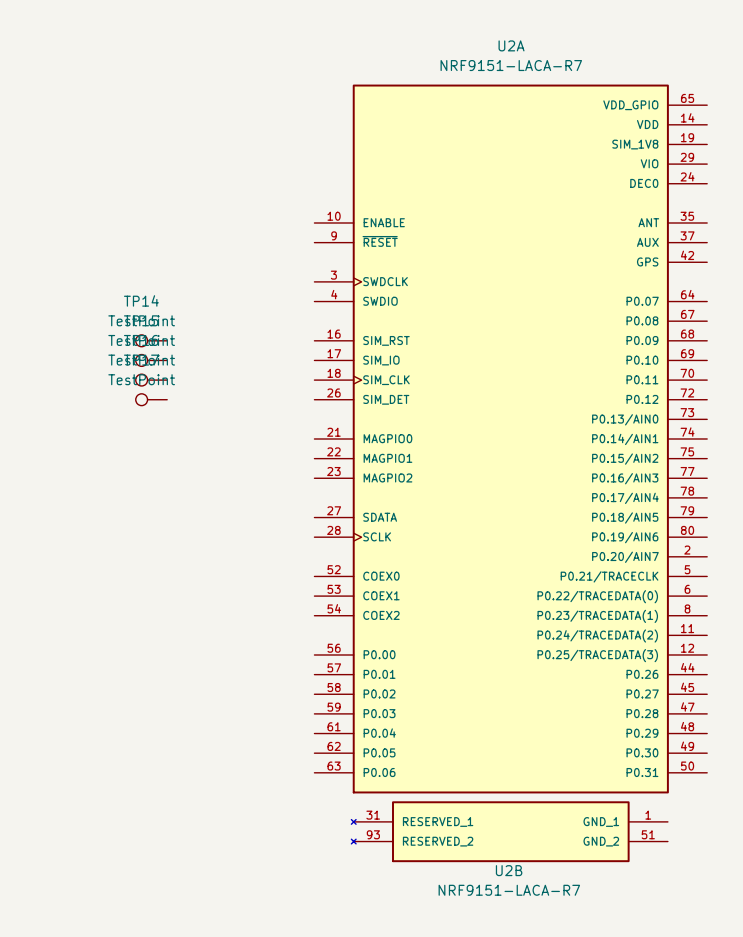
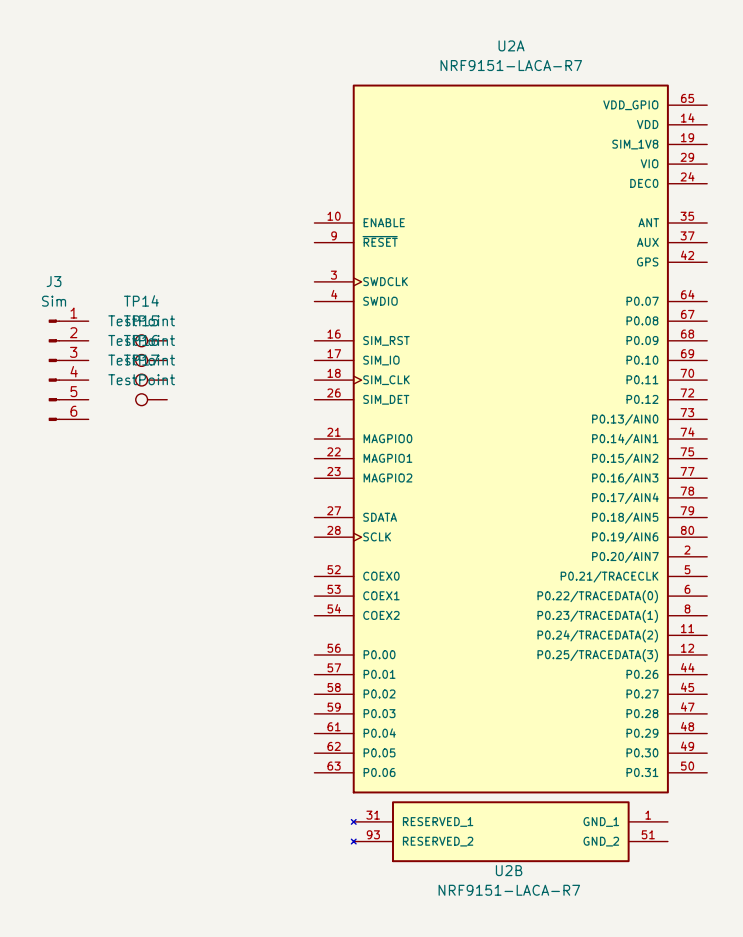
J3: none -> Sim (68, 370)

